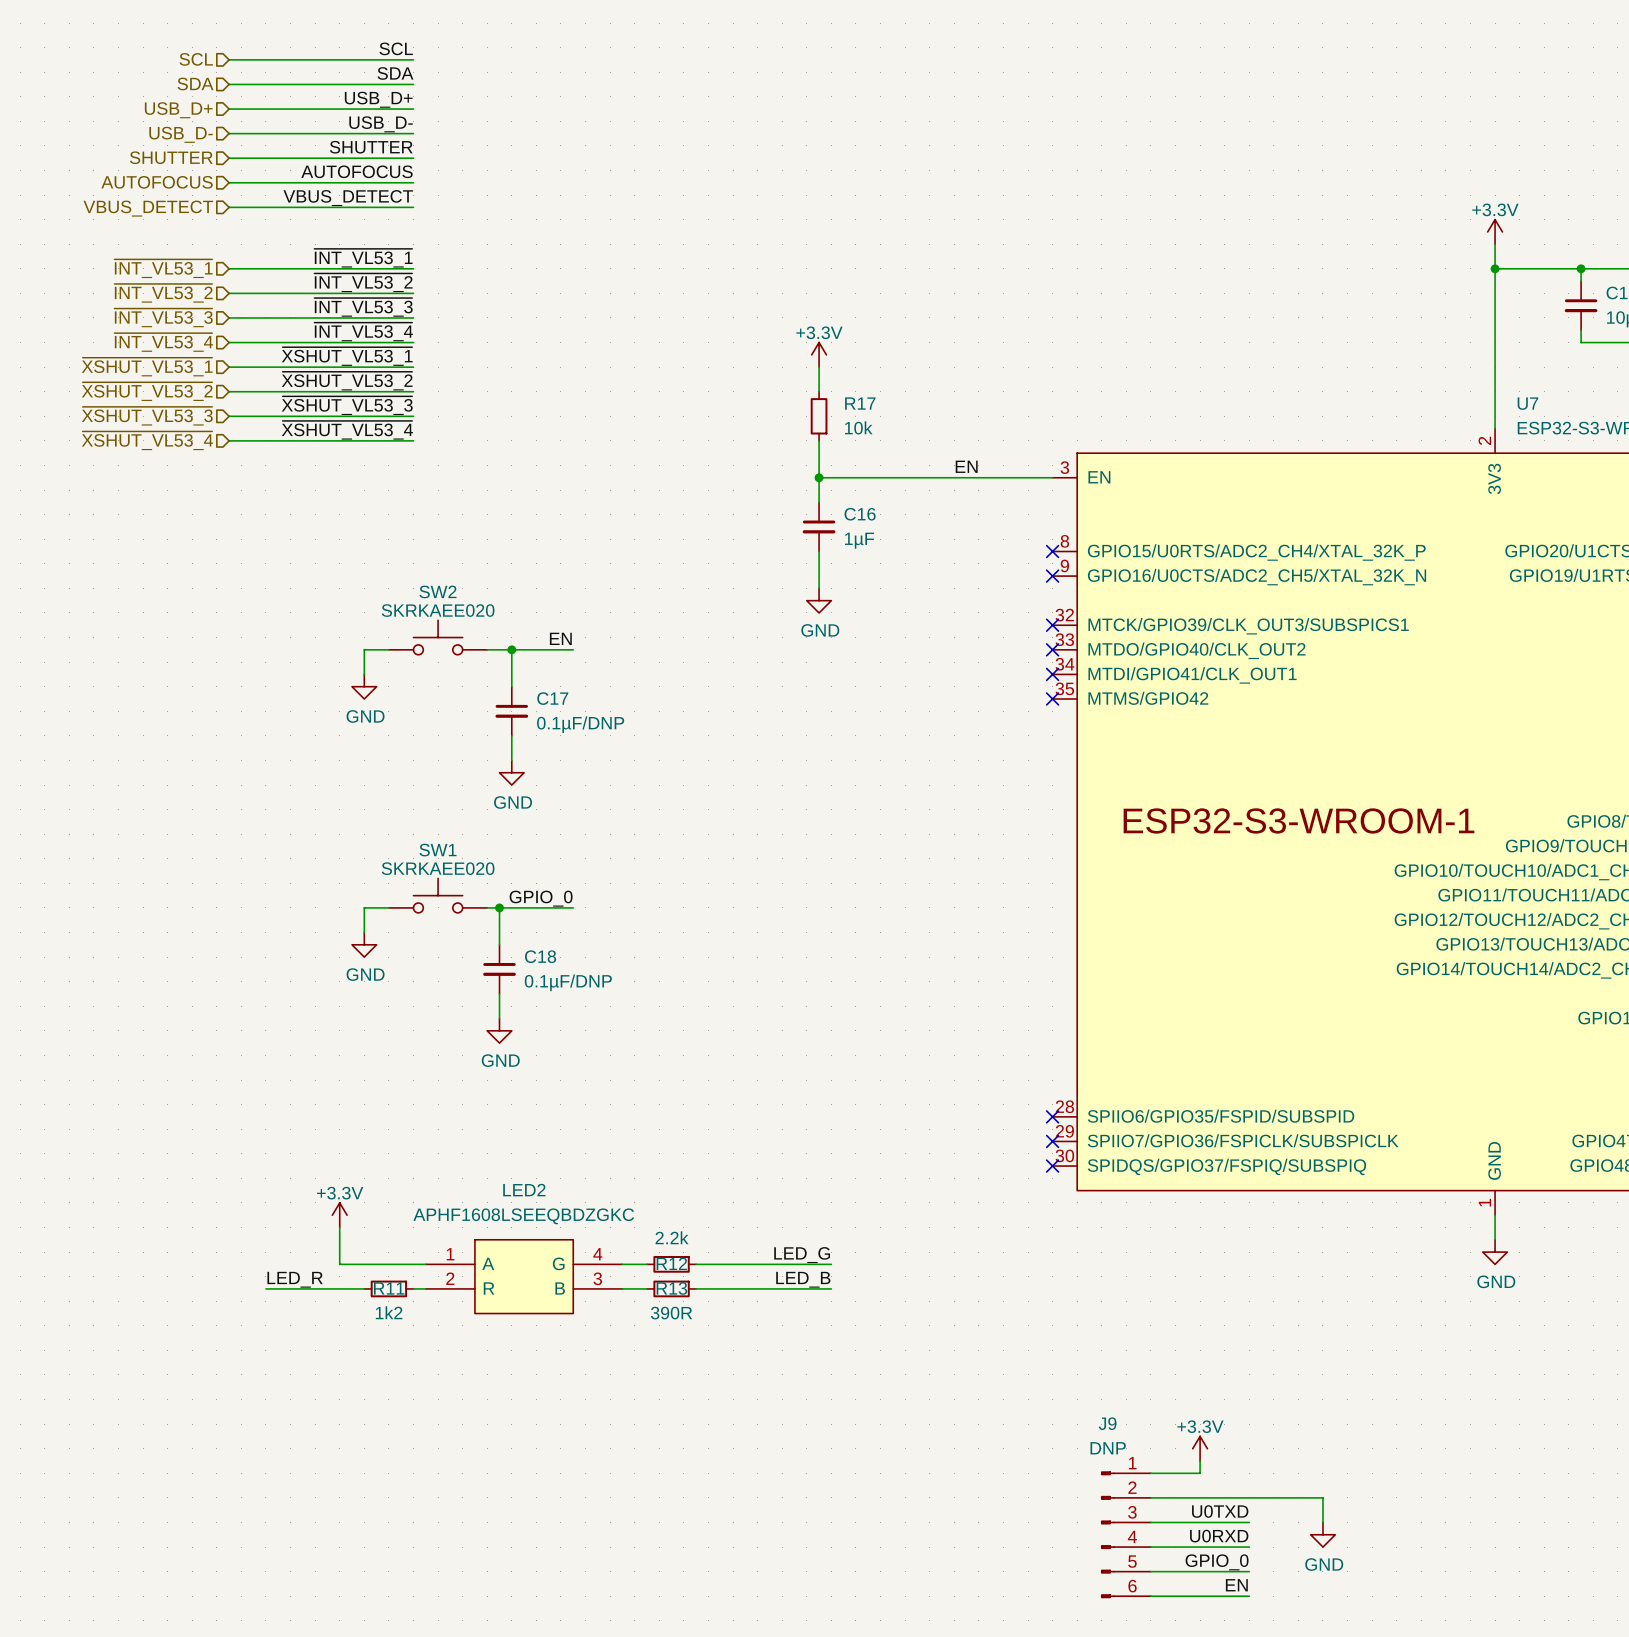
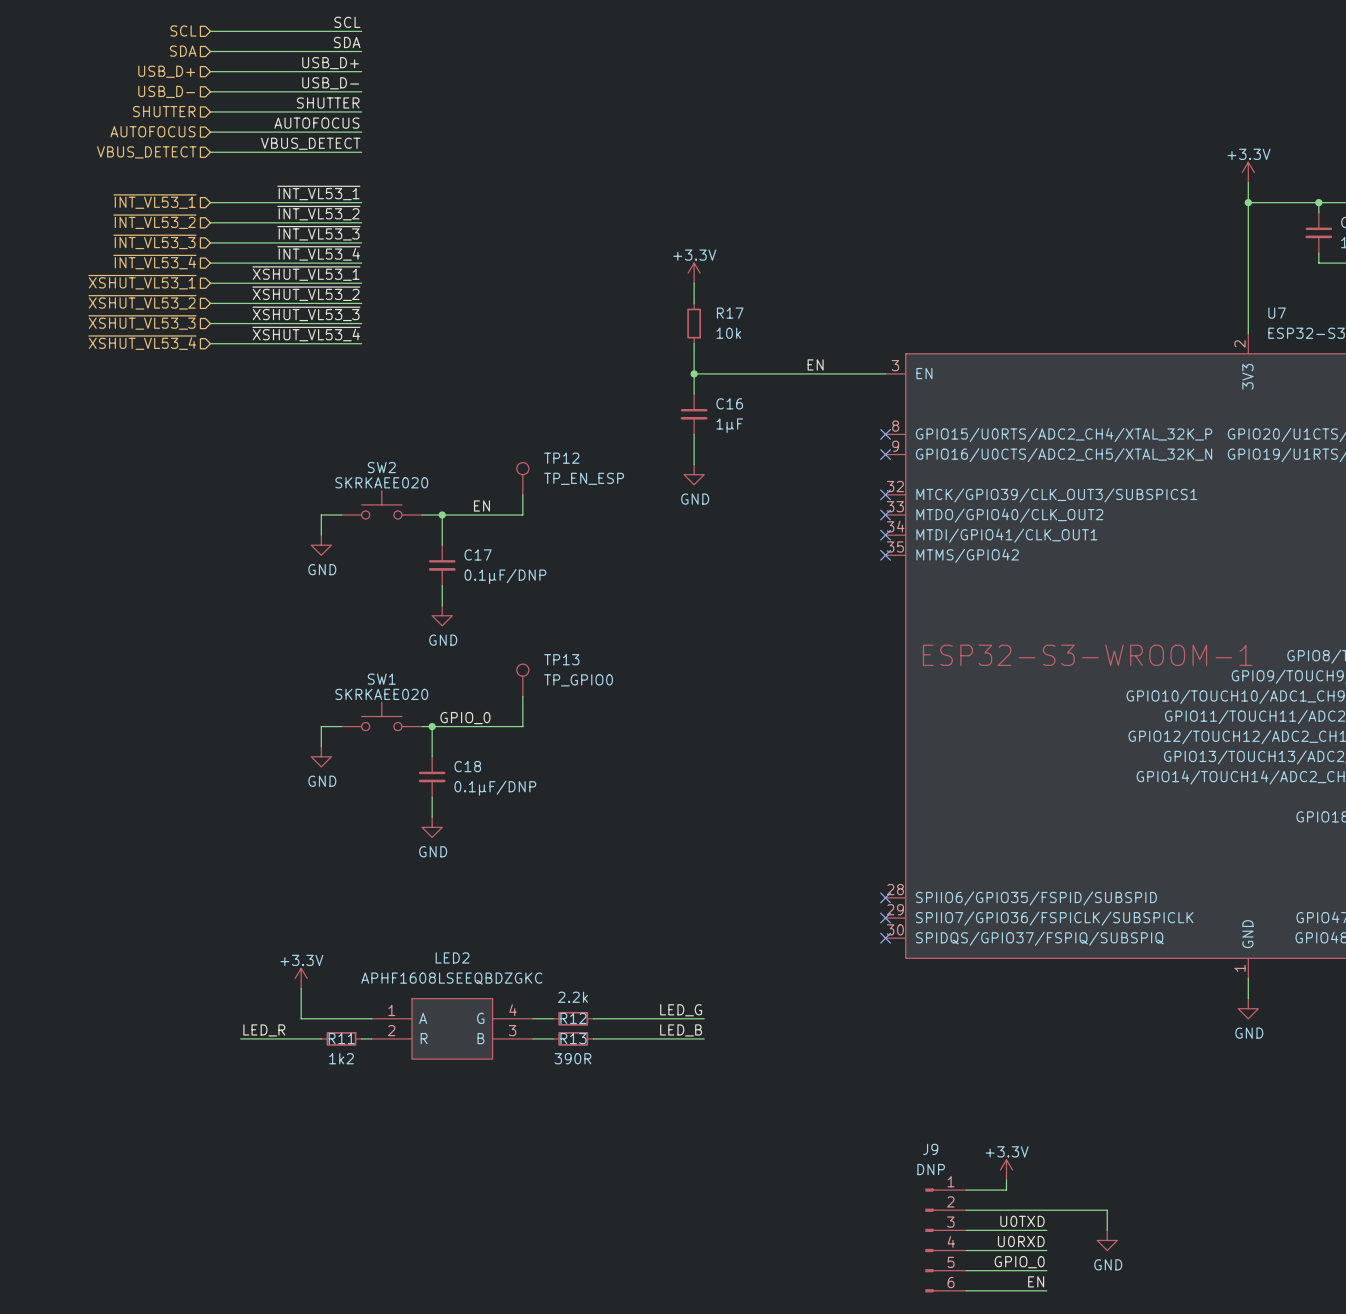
TP12: none -> TP_EN_ESP (522, 478)
wire: none -> (522, 494) (522, 514) (492, 514)
TP13: none -> TP_GPIO0 (522, 680)
wire: none -> (522, 696) (522, 726) (492, 726)

